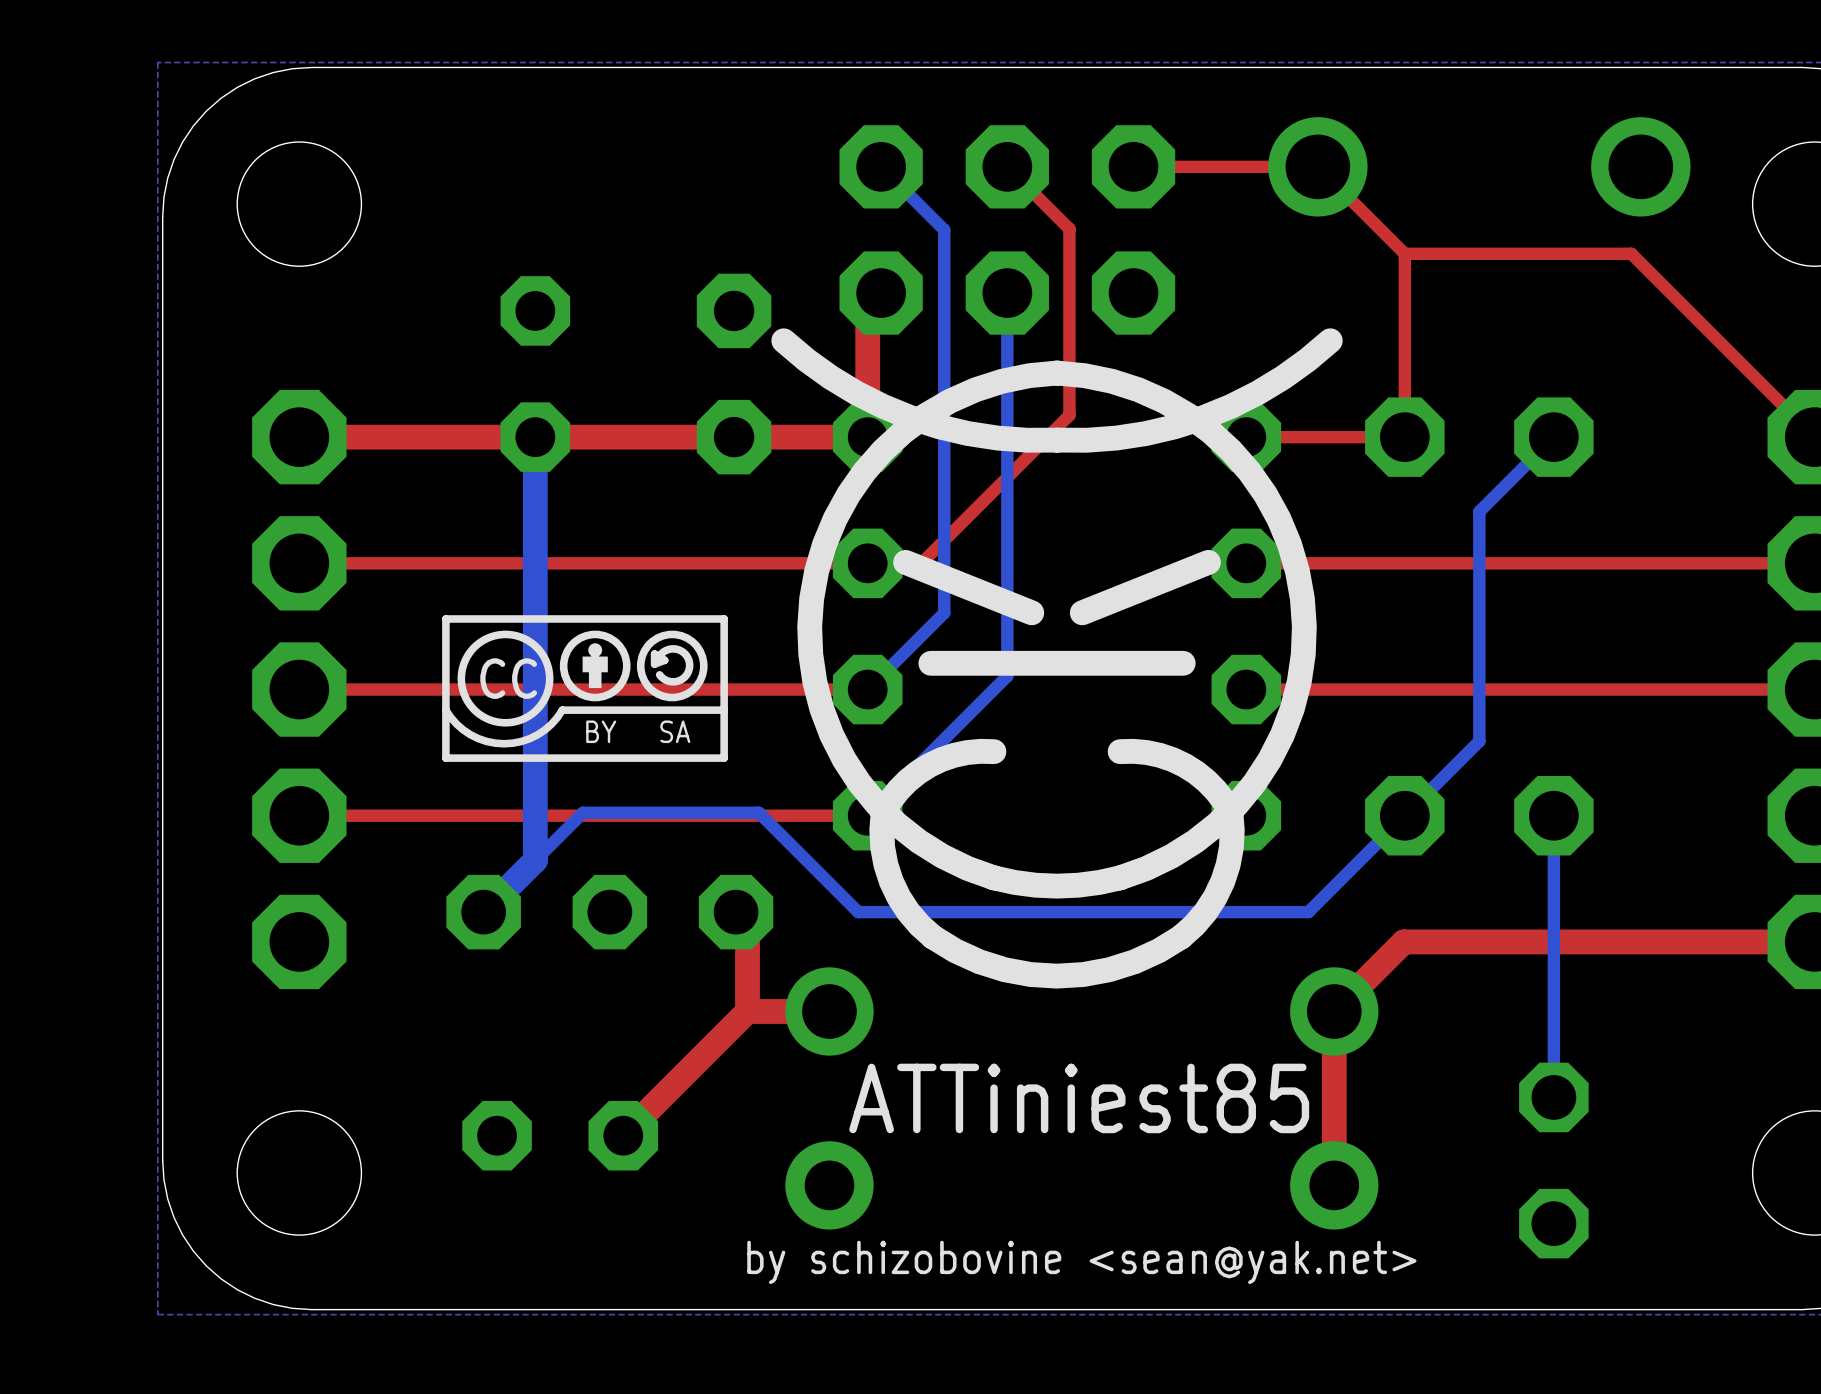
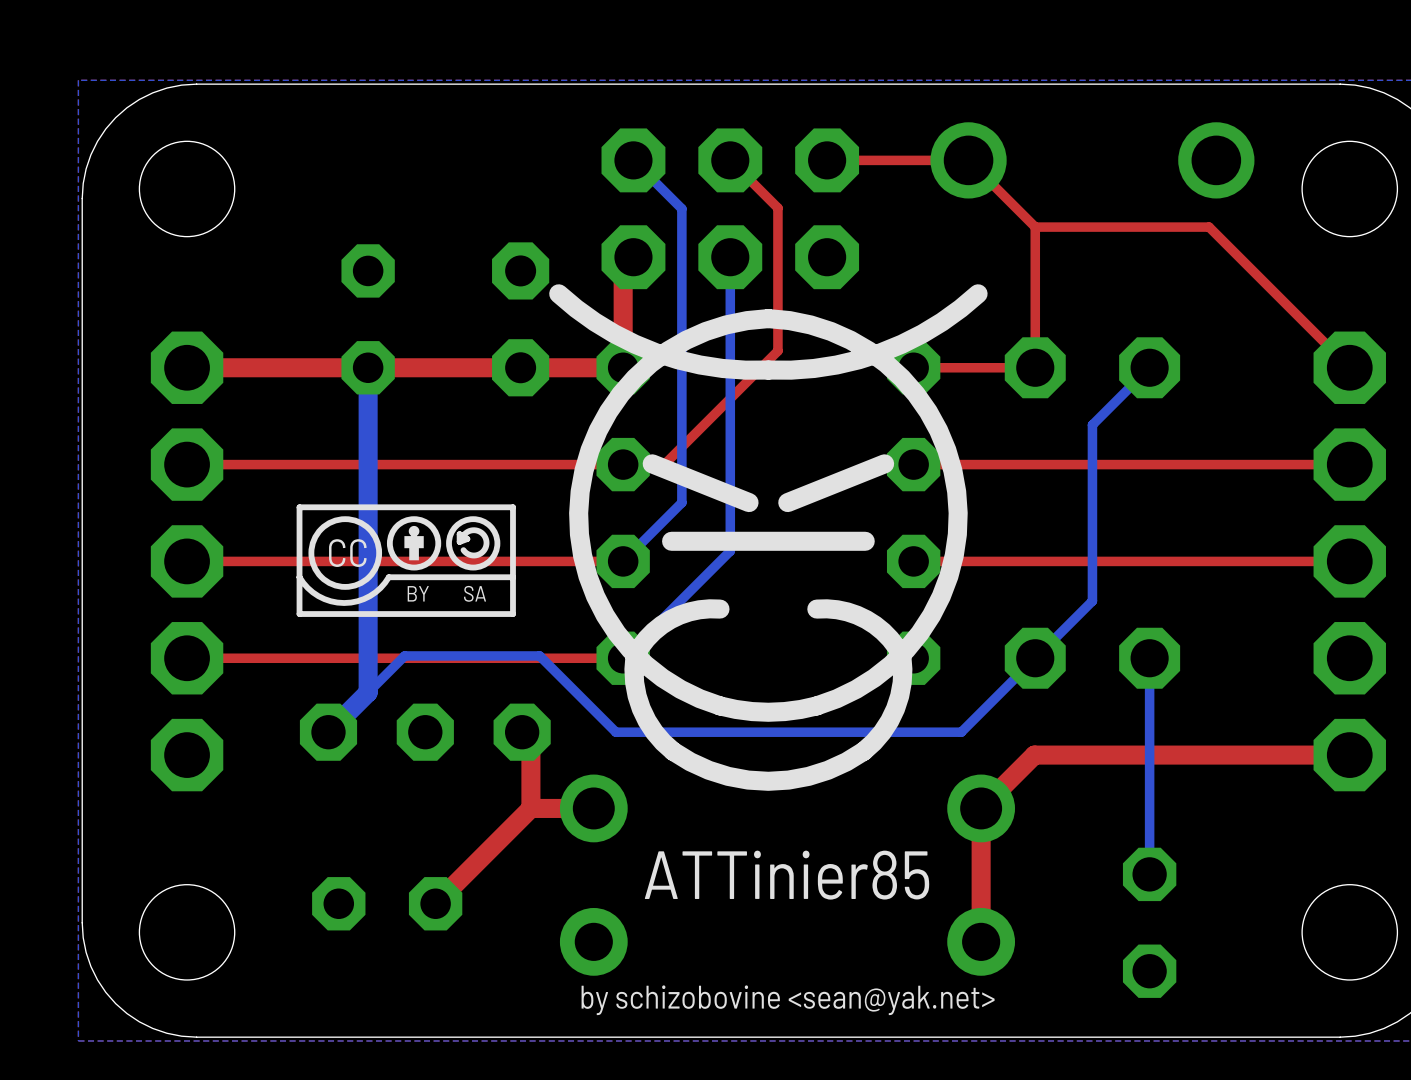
text: ATTiniest85 (1079, 1098) -> ATTinier85 (786, 875)

